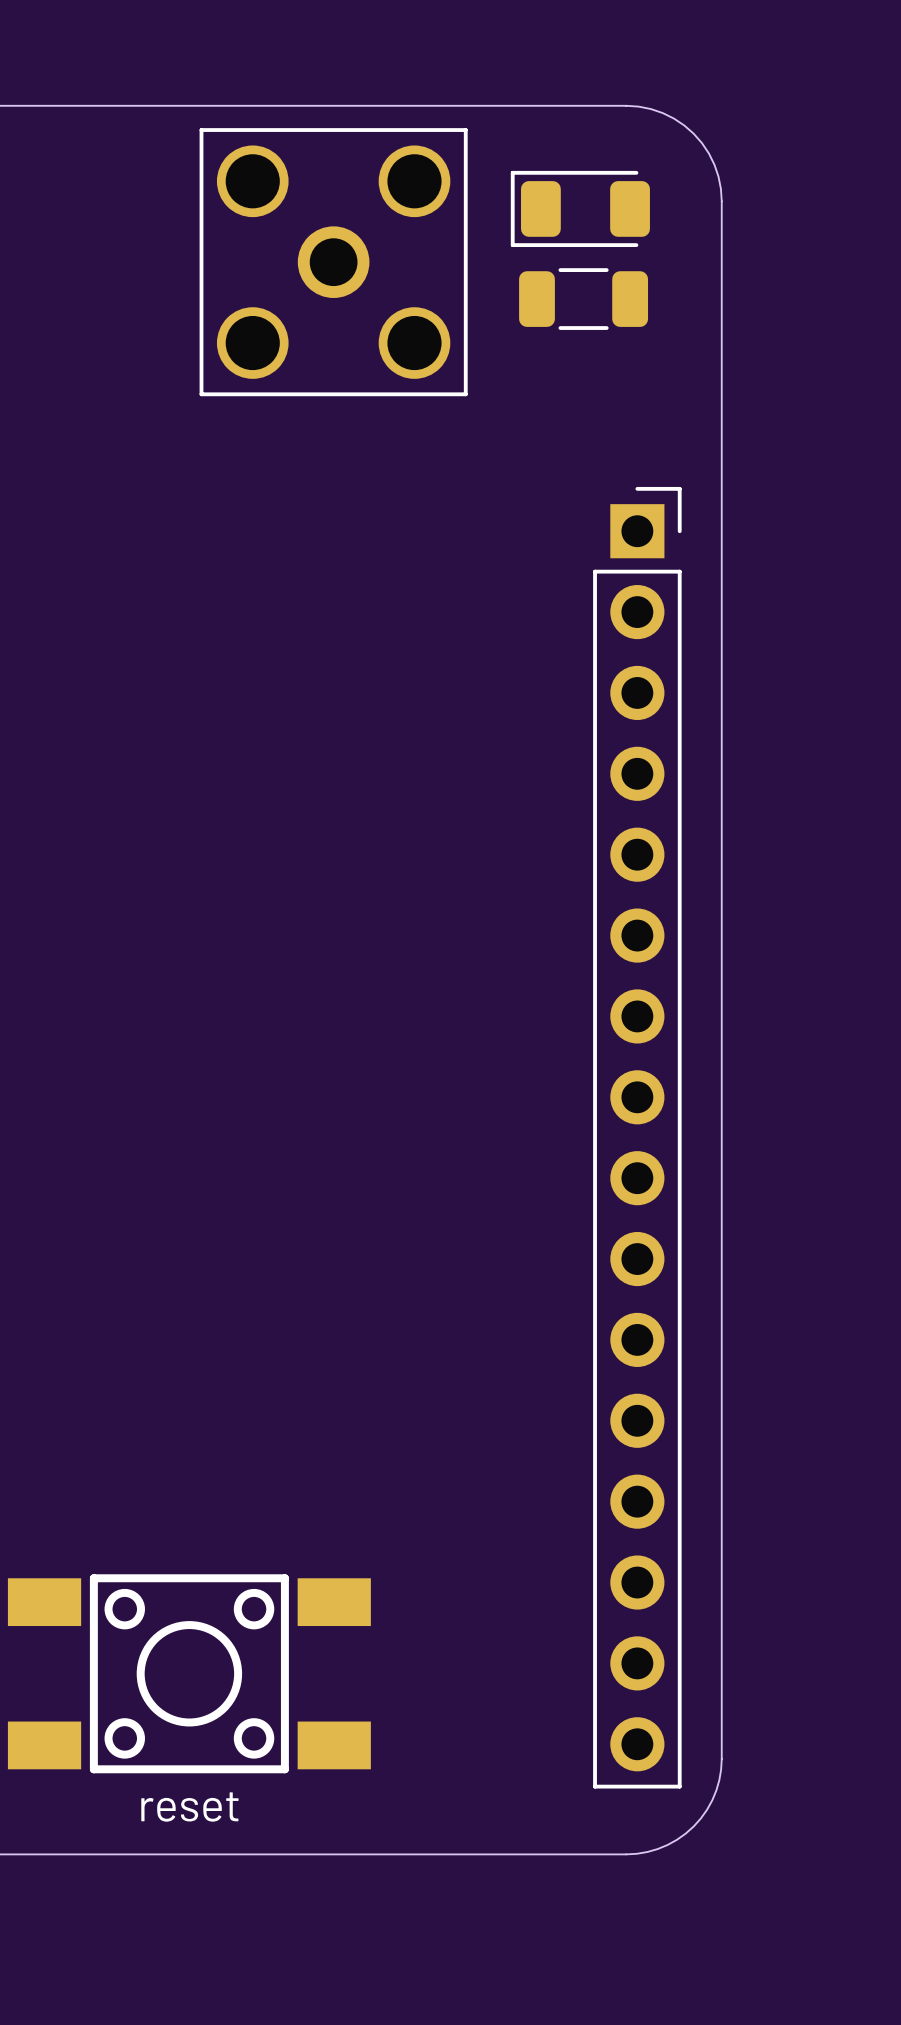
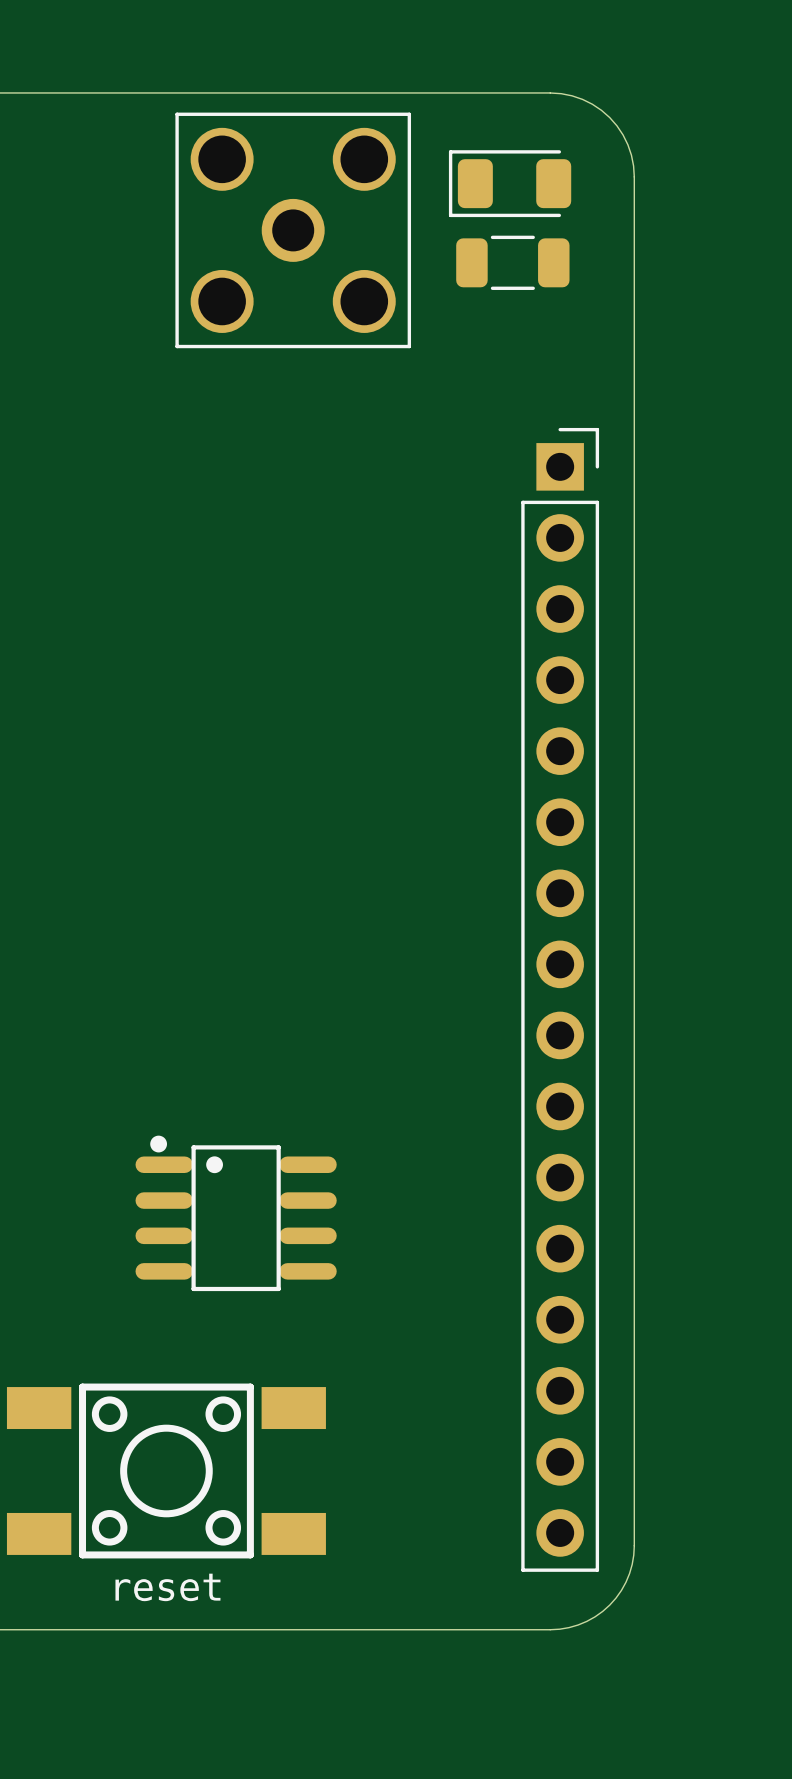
part: none -> (236, 1213)

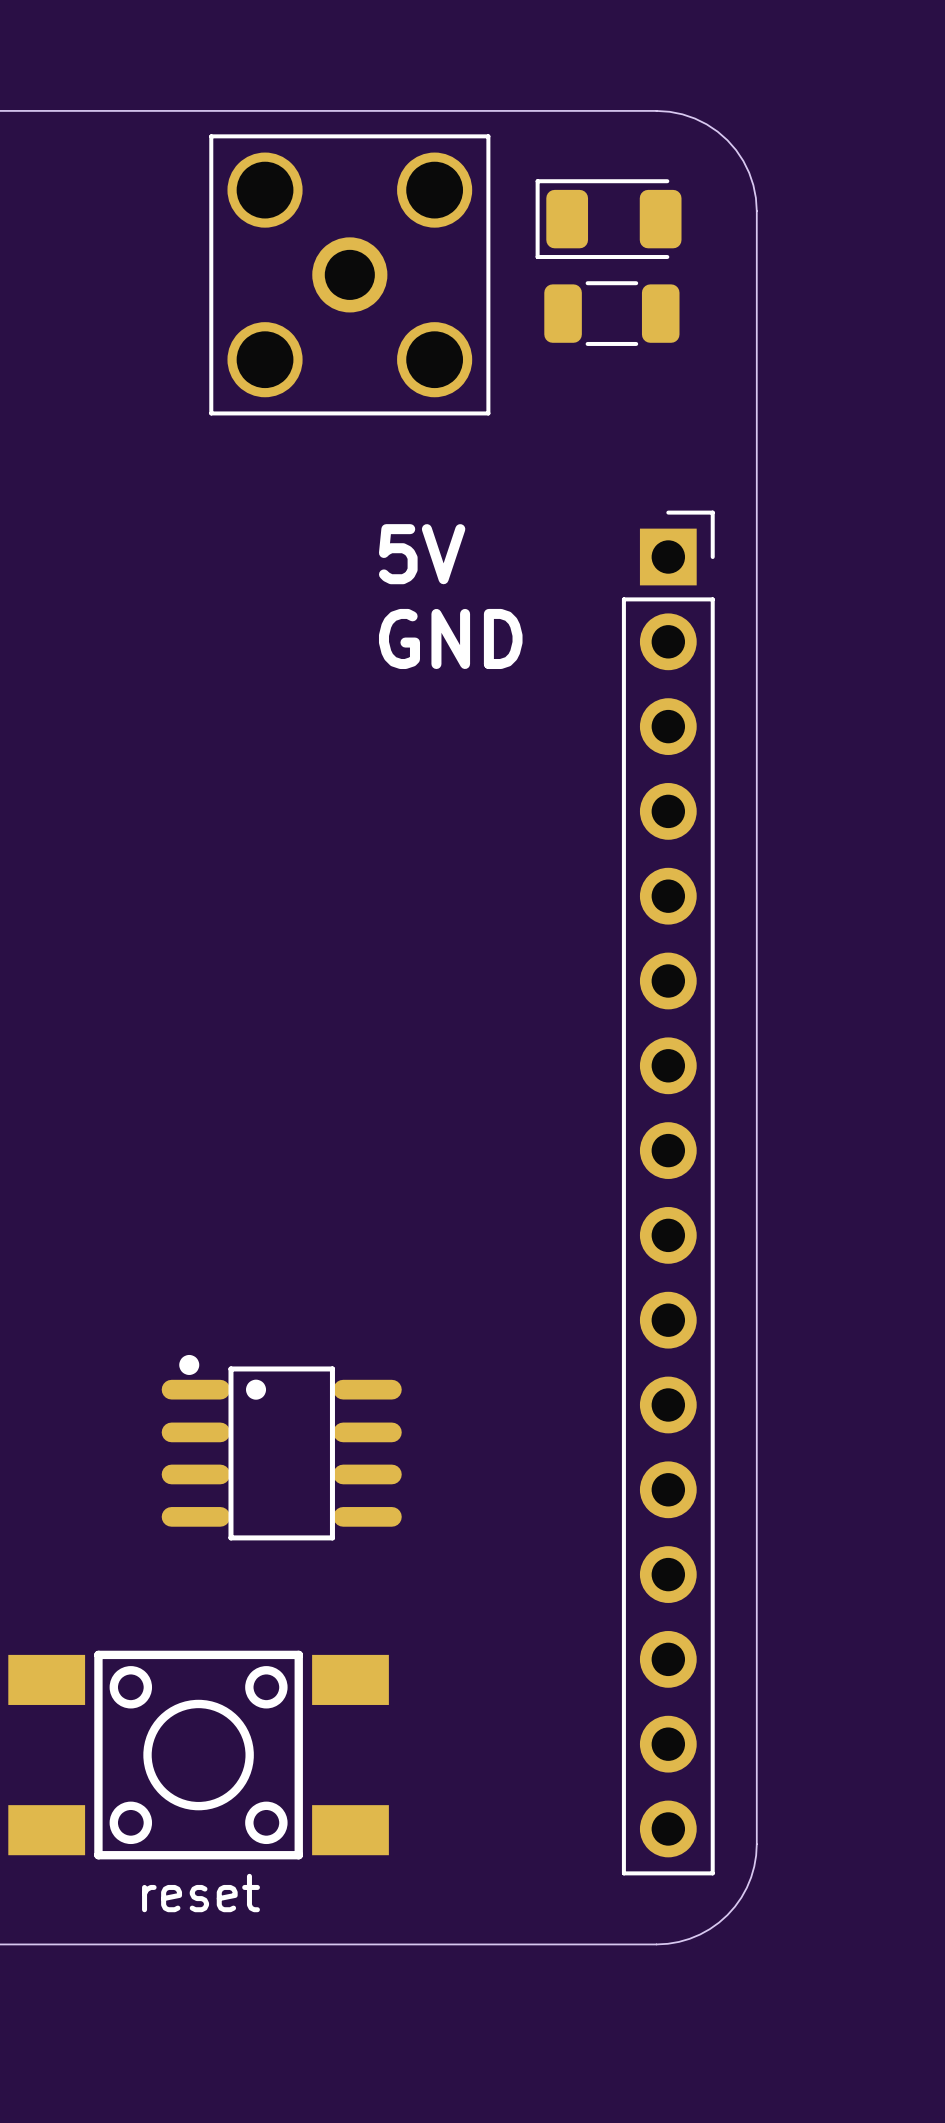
text: none -> 5V (422, 554)
text: none -> GND (450, 638)

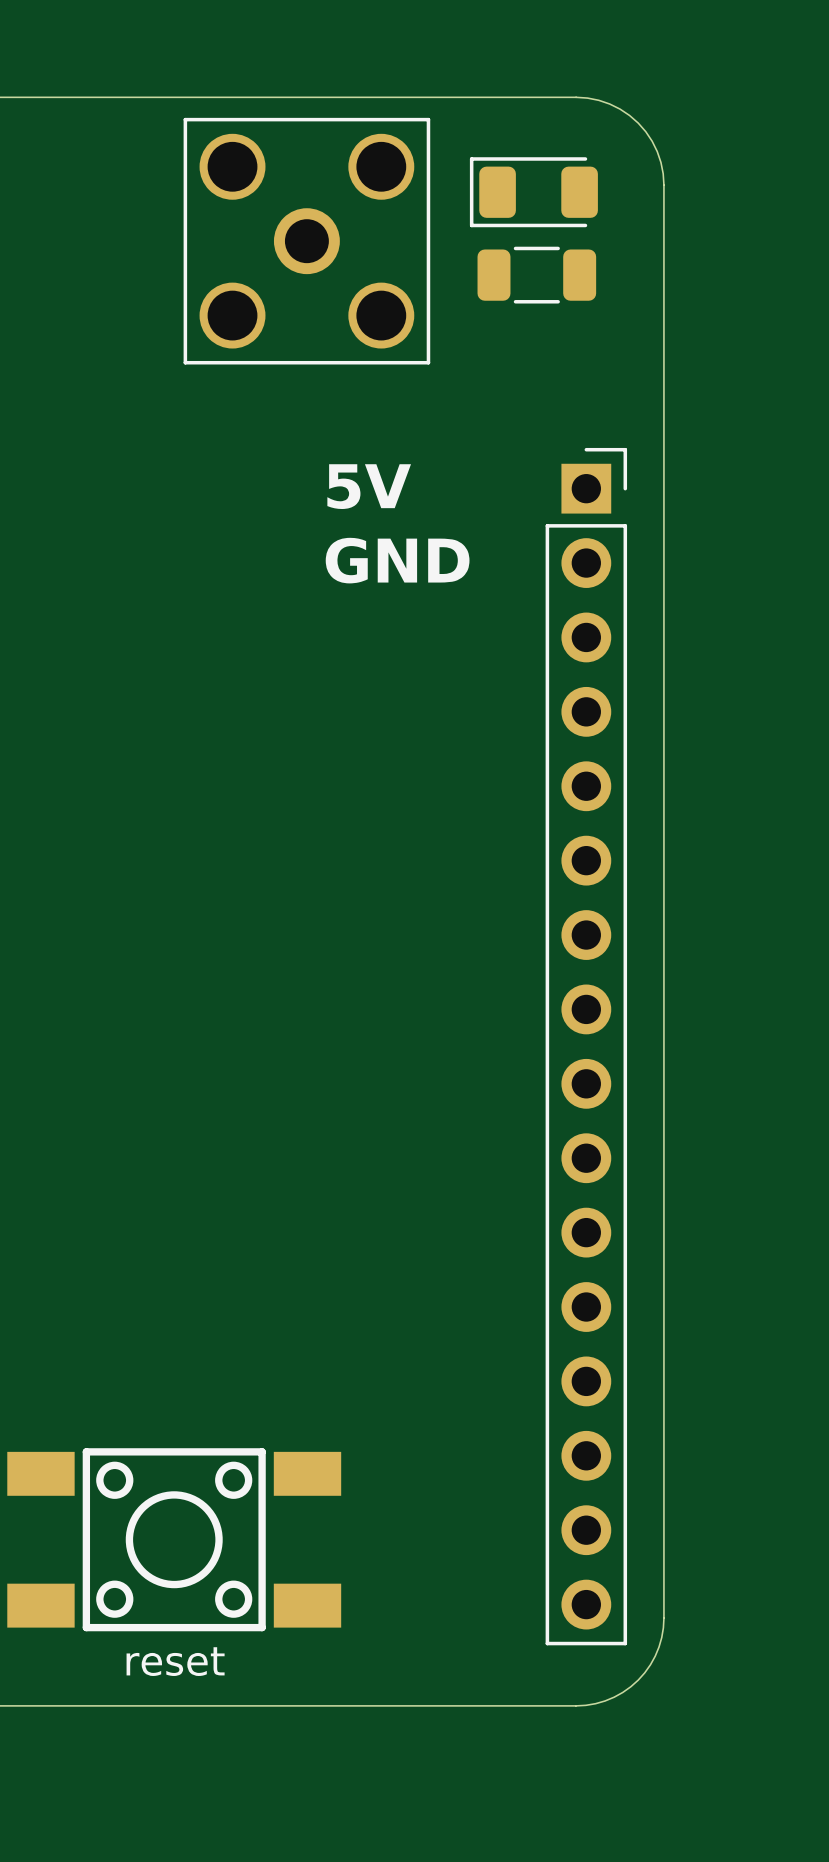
part: (281, 1447) -> none

